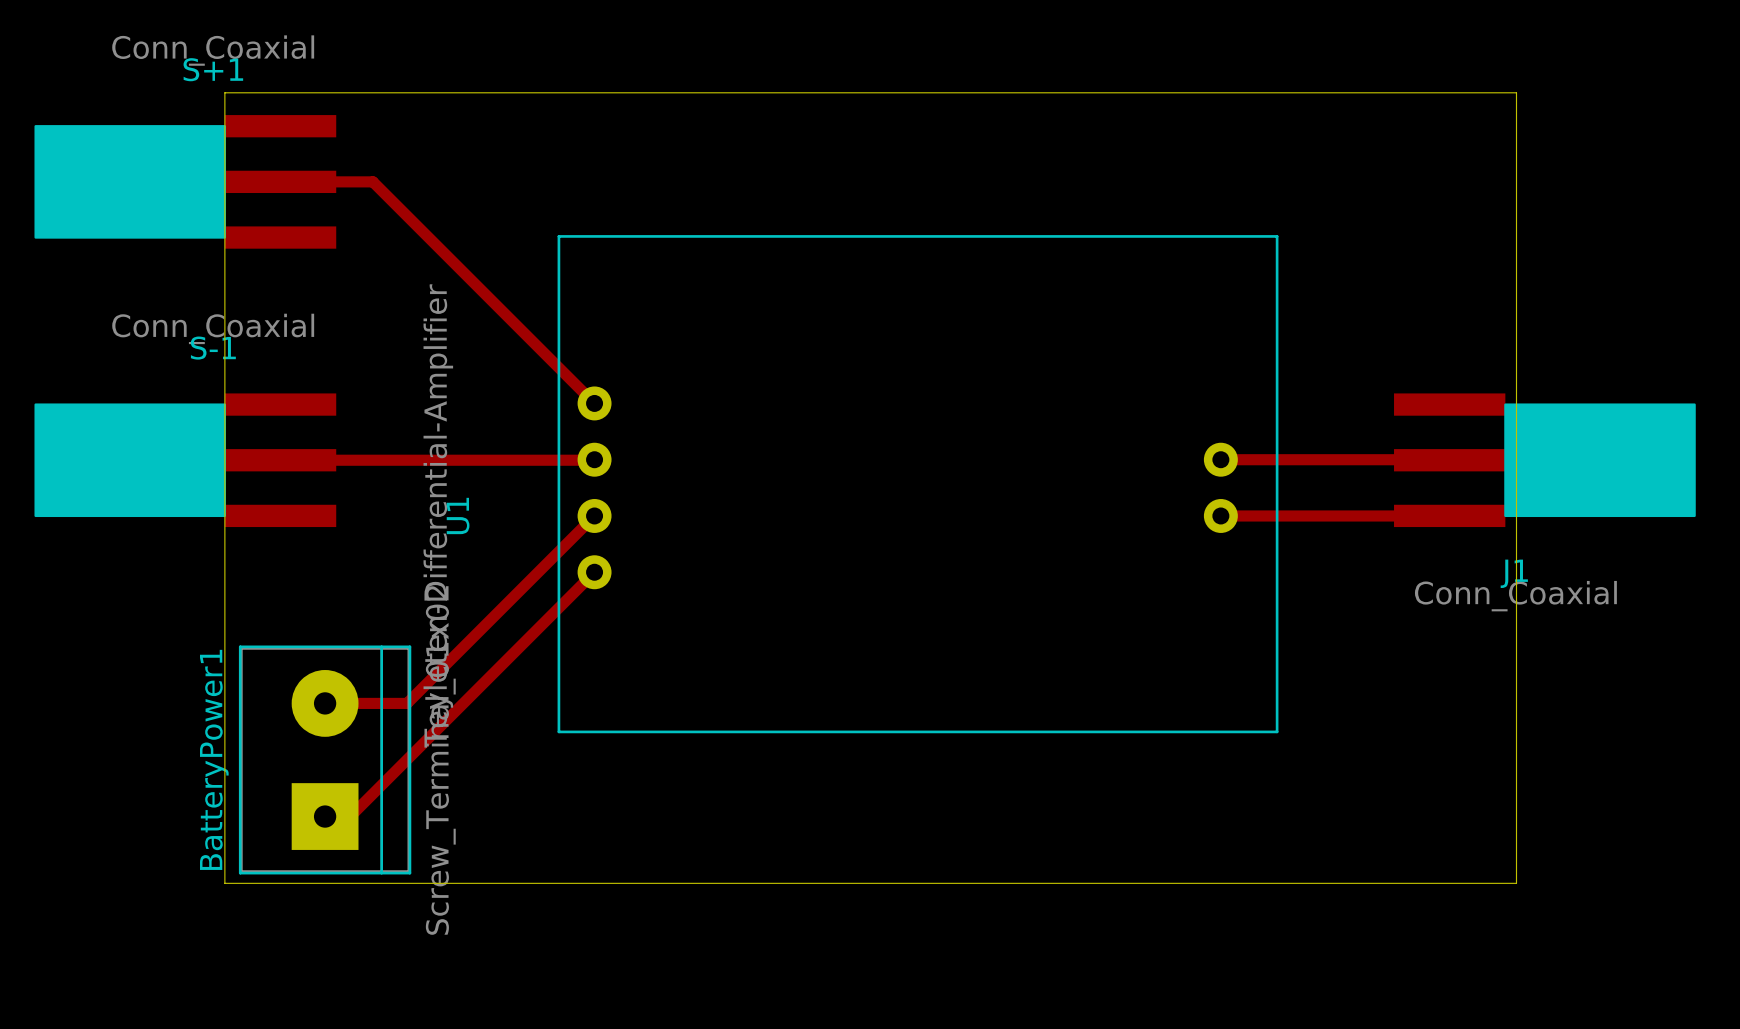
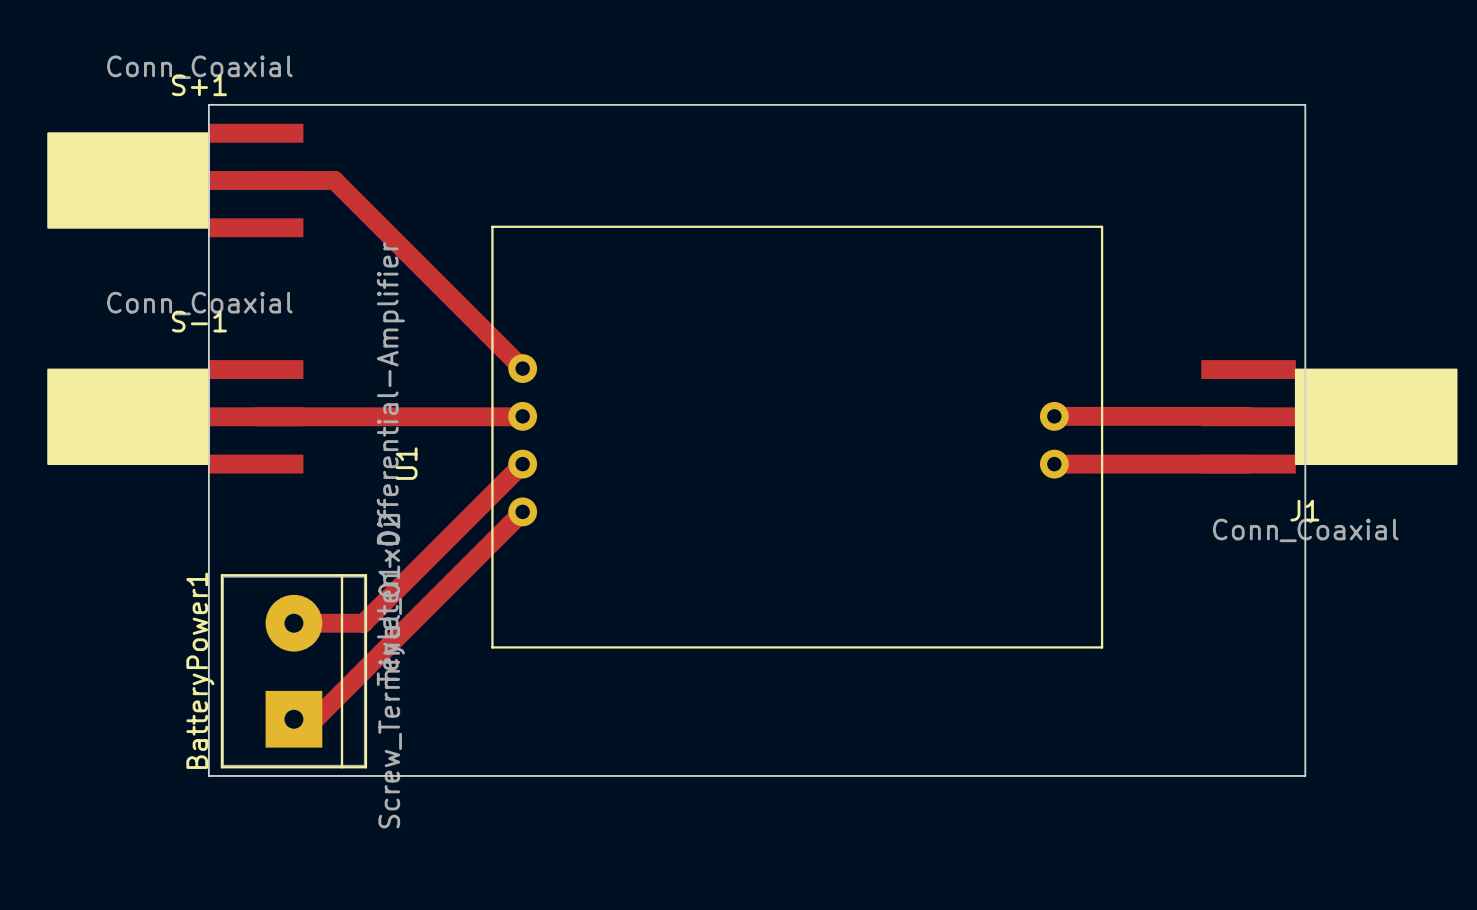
top track width: thin (280, 181) (372, 181) (594, 403) -> thick (256, 180) (334, 180) (522, 368)
top track width: thin (1220, 459) (1449, 459) -> thick (1054, 416) (1248, 416)
top track width: thin (280, 460) (594, 460) -> thick (256, 416) (522, 416)
top track width: thin (594, 515) (407, 703) (325, 703) -> thick (522, 464) (363, 623) (293, 623)
top track width: thin (1220, 515) (1449, 515) -> thick (1054, 464) (1248, 464)
top track width: thin (594, 572) (350, 816) -> thick (522, 511) (315, 719)

